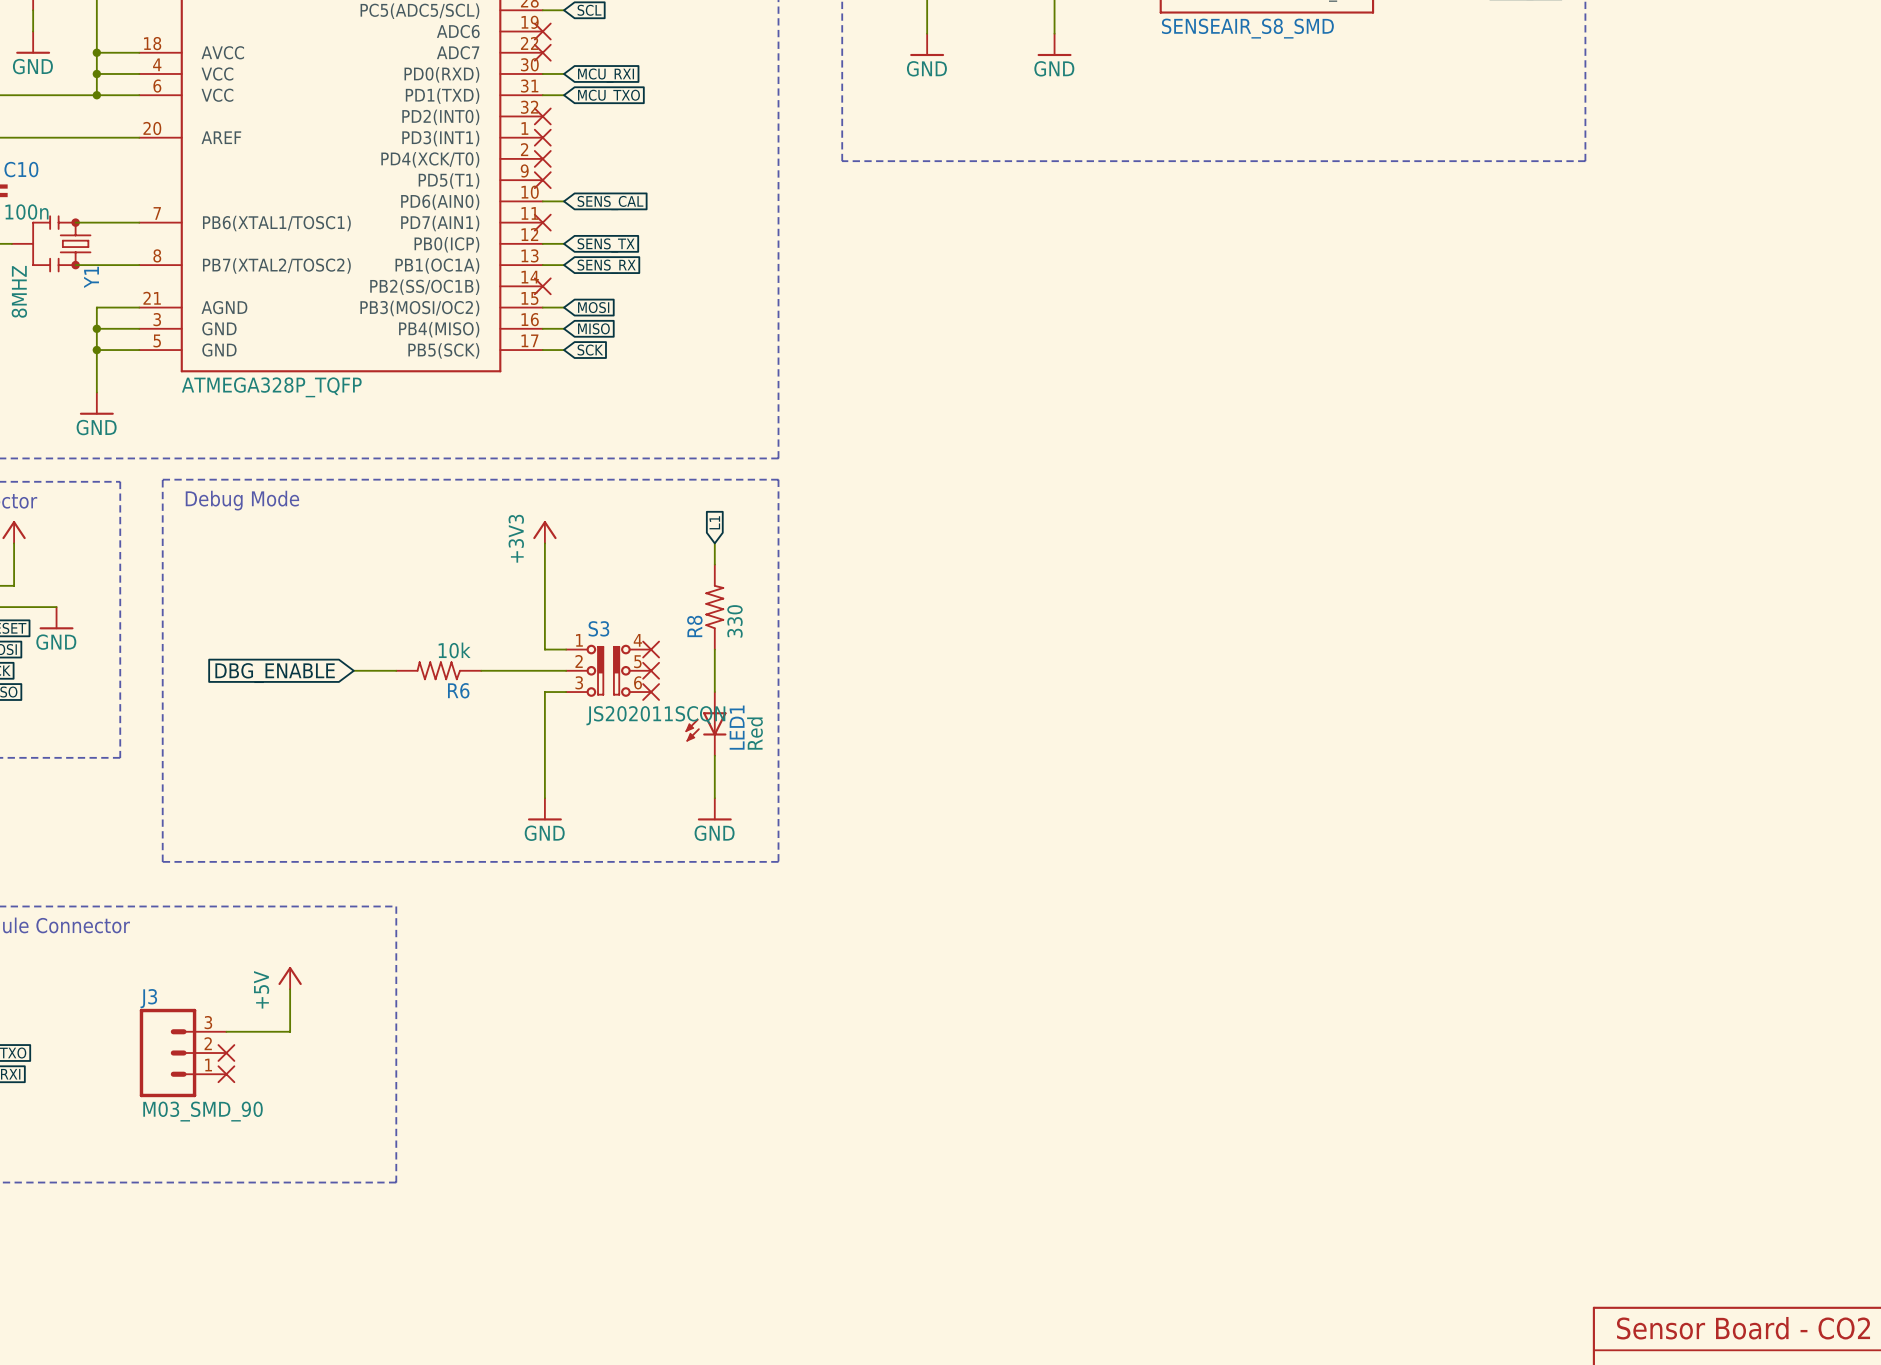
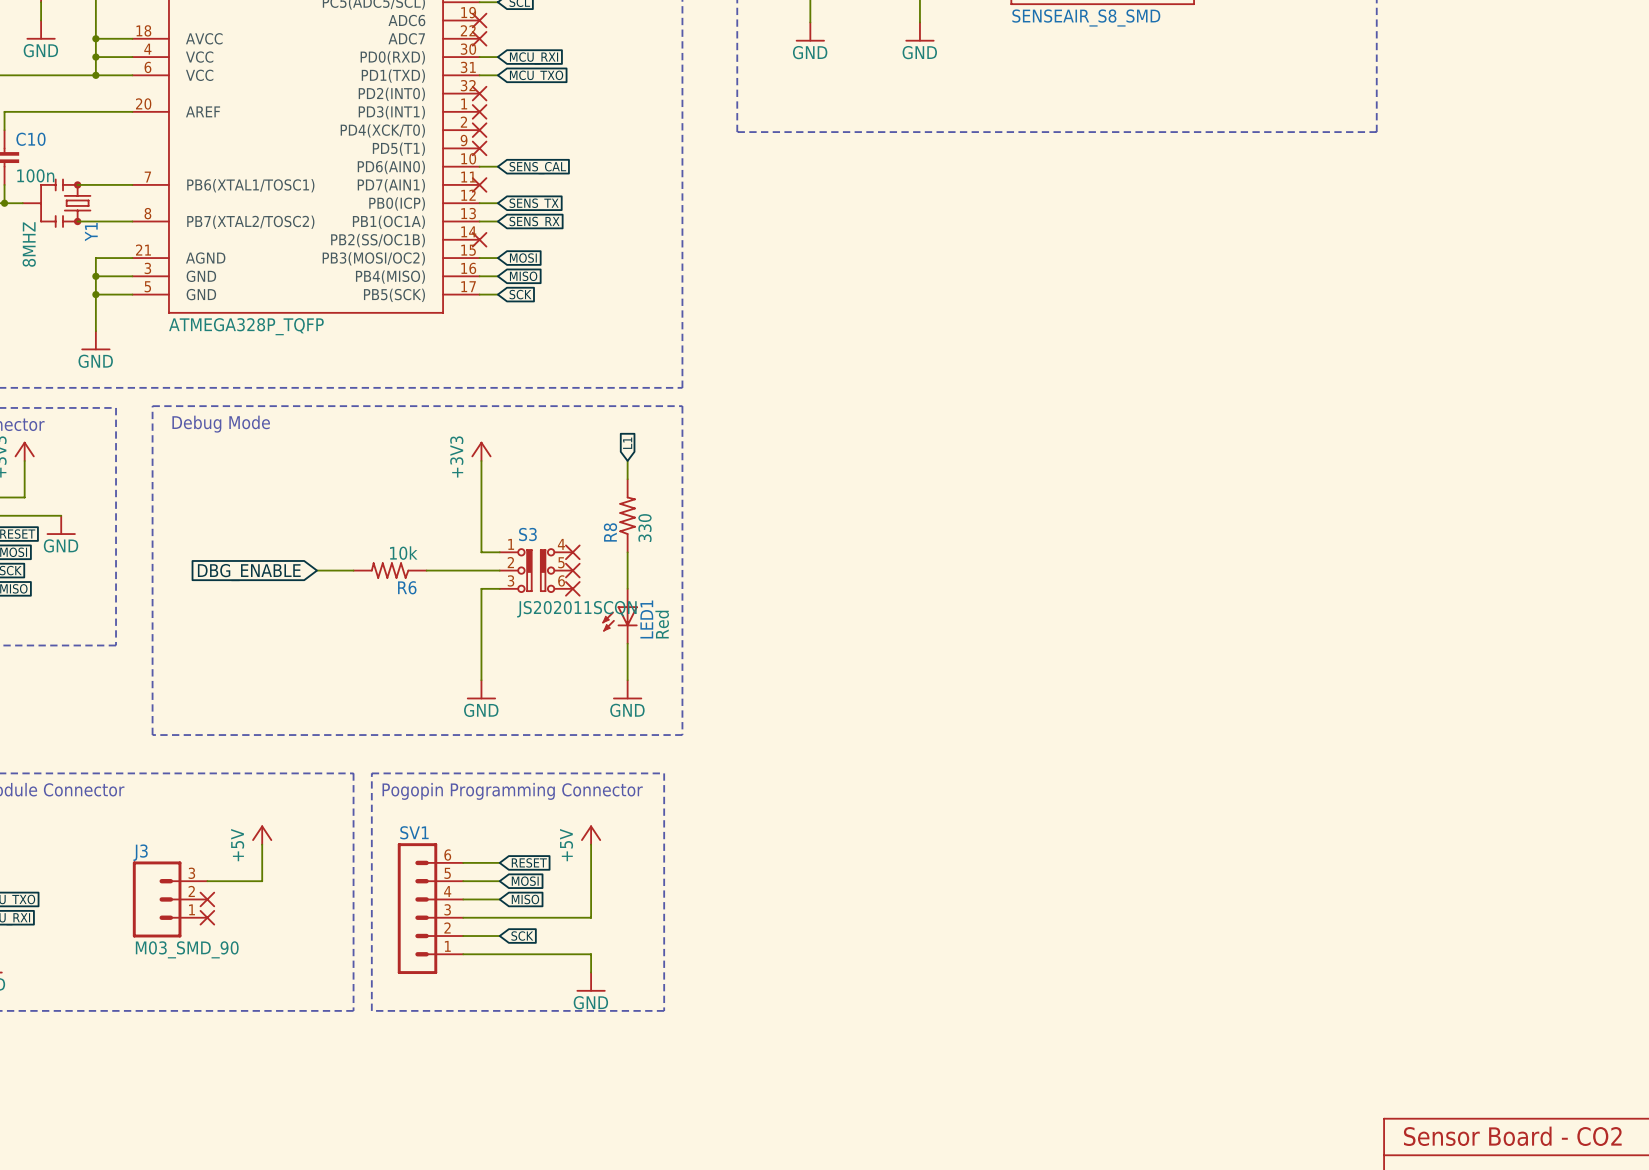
line: none -> (371, 773) (371, 1010) (664, 1010) (664, 773) (371, 773)
text: none -> Pogopin Programming Connector (512, 791)
power symbol: none -> +5V (591, 835)
wire: none -> (591, 844) (591, 917) (463, 917)
wire: none -> (463, 862) (499, 862)
global label: none -> RESET (529, 862)
wire: none -> (463, 881) (499, 881)
global label: none -> MOSI (525, 881)
wire: none -> (463, 899) (499, 899)
global label: none -> MISO (525, 899)
SV1: none -> (430, 908)
wire: none -> (463, 936) (499, 936)
global label: none -> SCK (522, 936)
wire: none -> (463, 954) (591, 954) (591, 972)
power symbol: none -> GND (591, 982)

